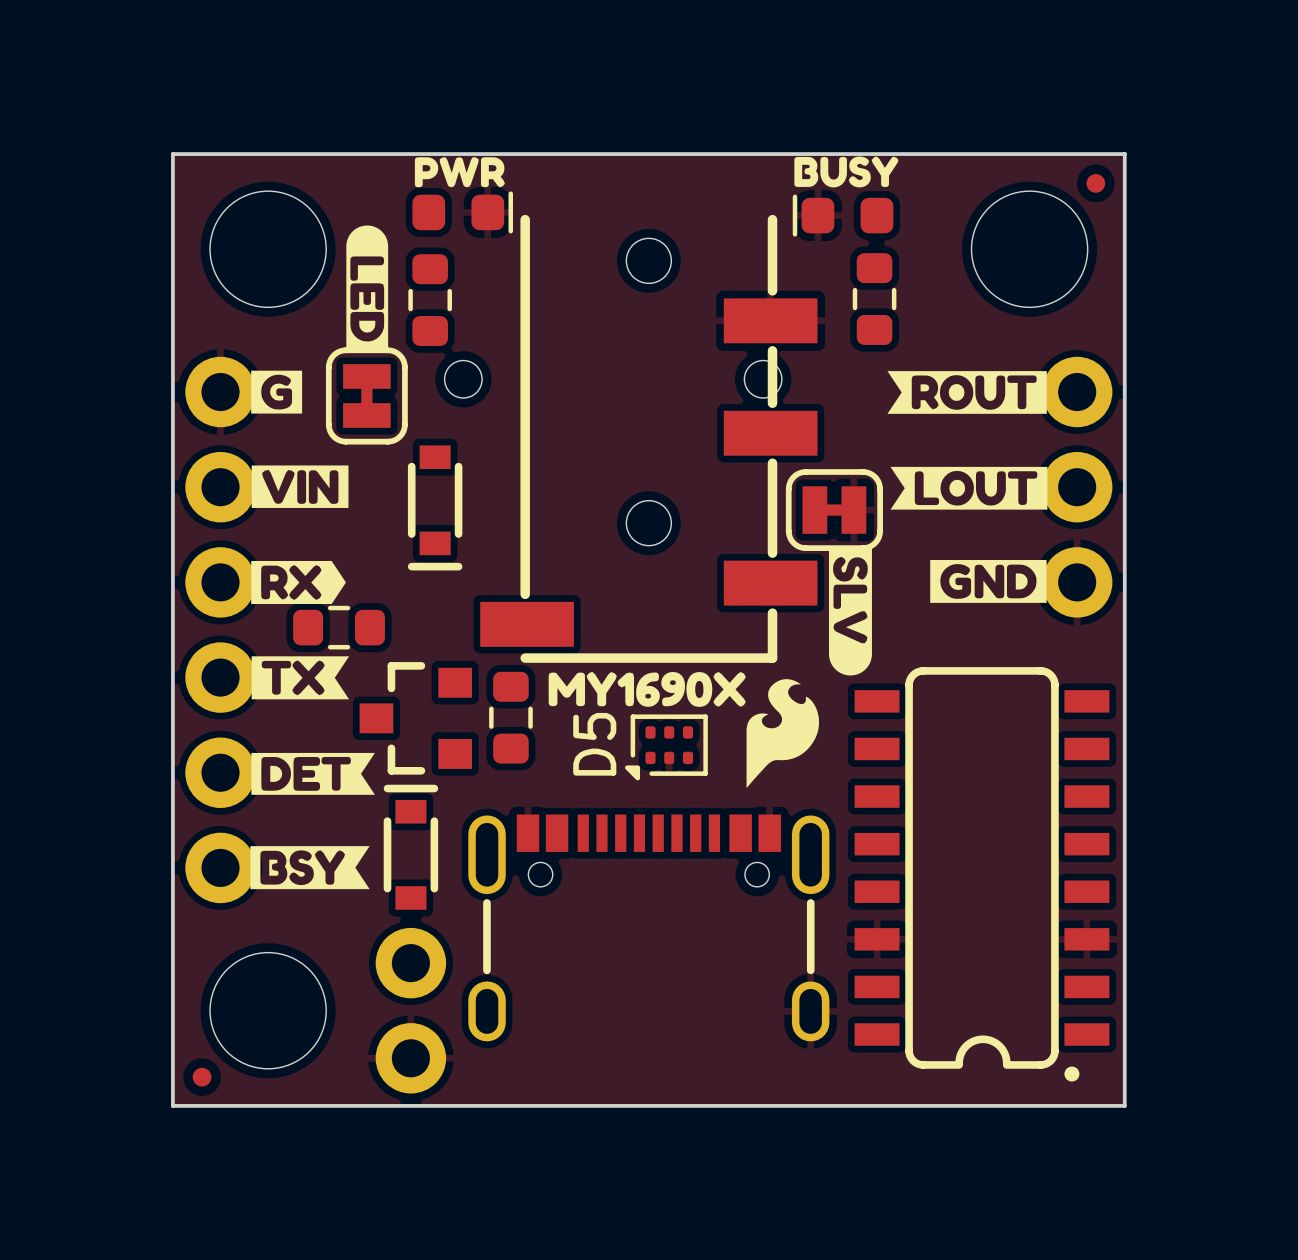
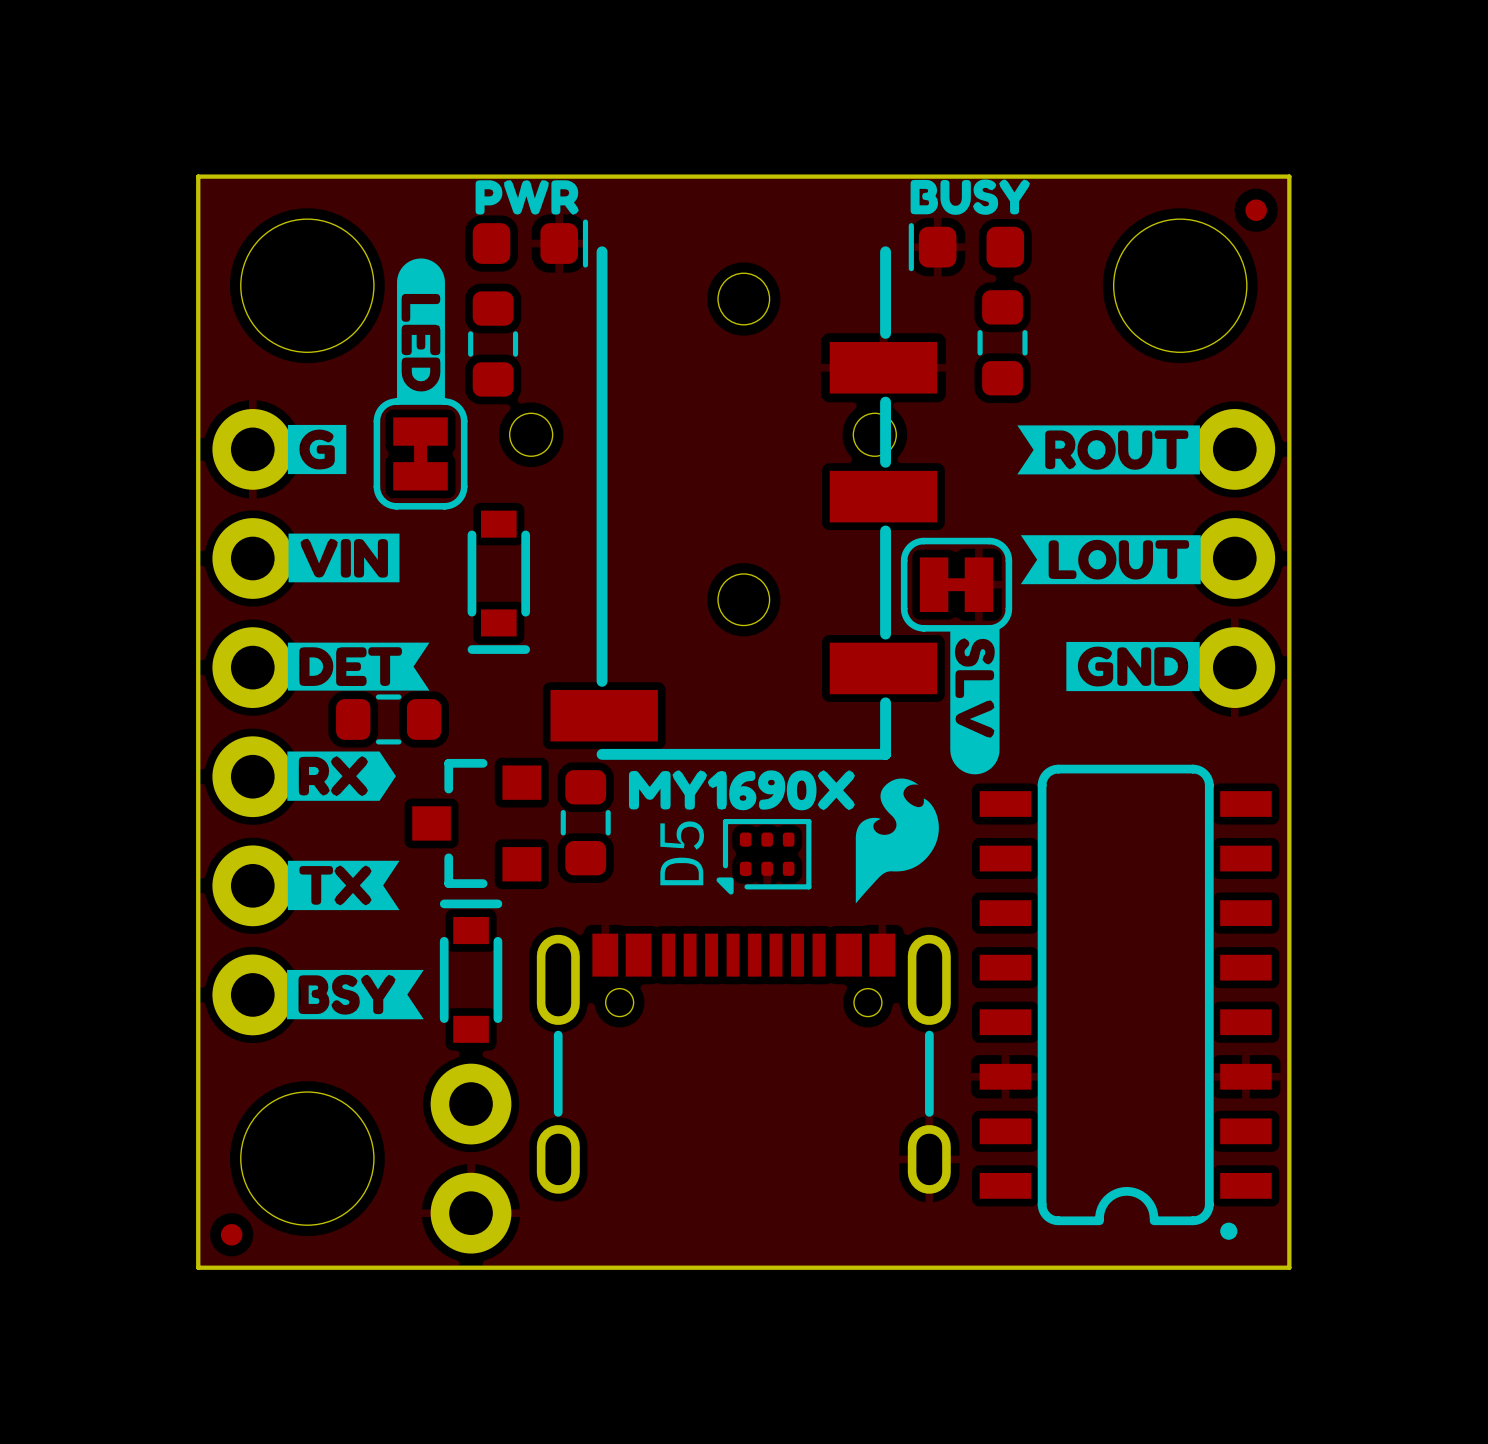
drawing position: (298, 582) -> (341, 776)
drawing position: (300, 677) -> (343, 885)
drawing position: (313, 773) -> (358, 666)

